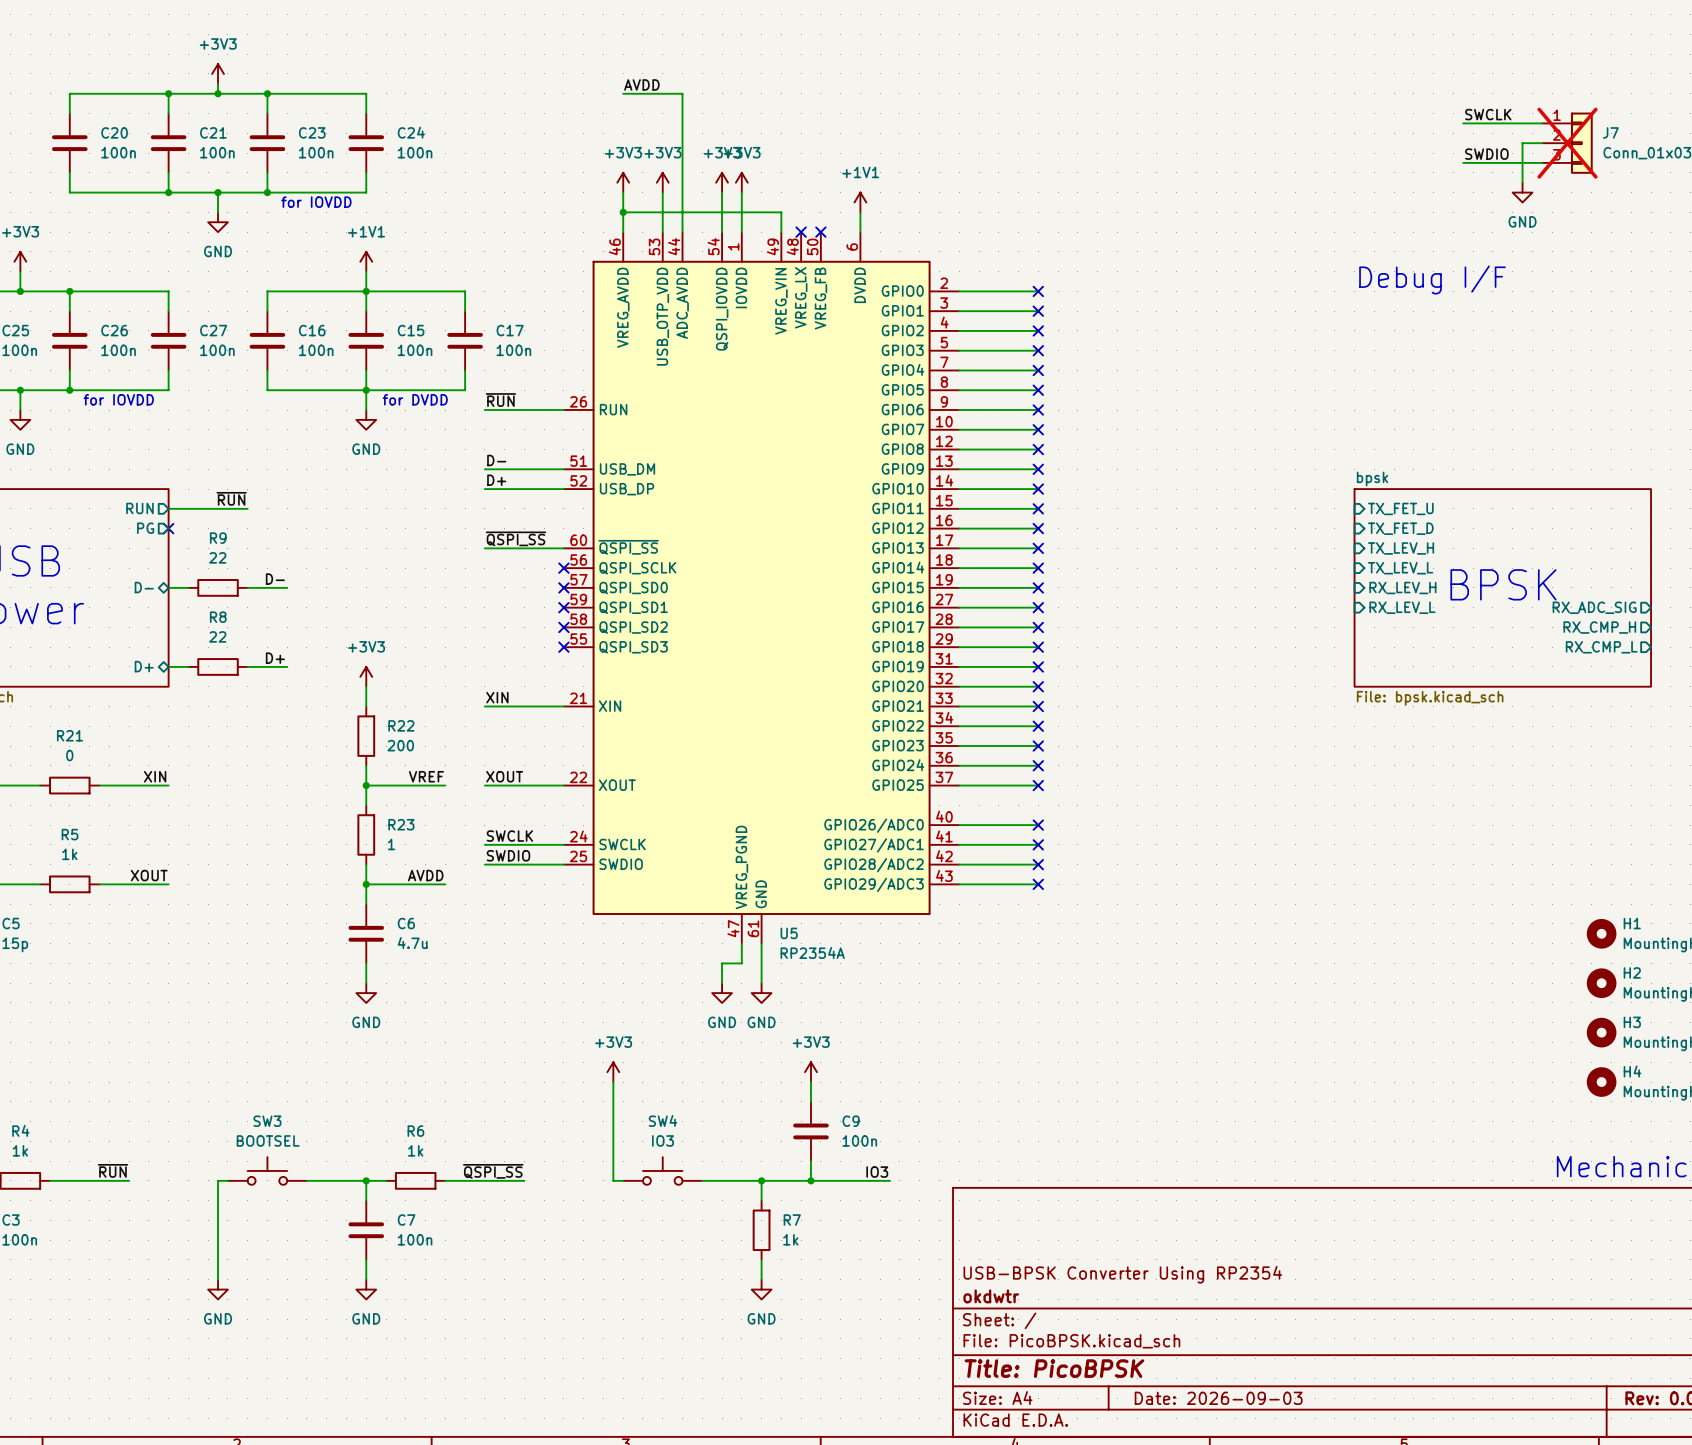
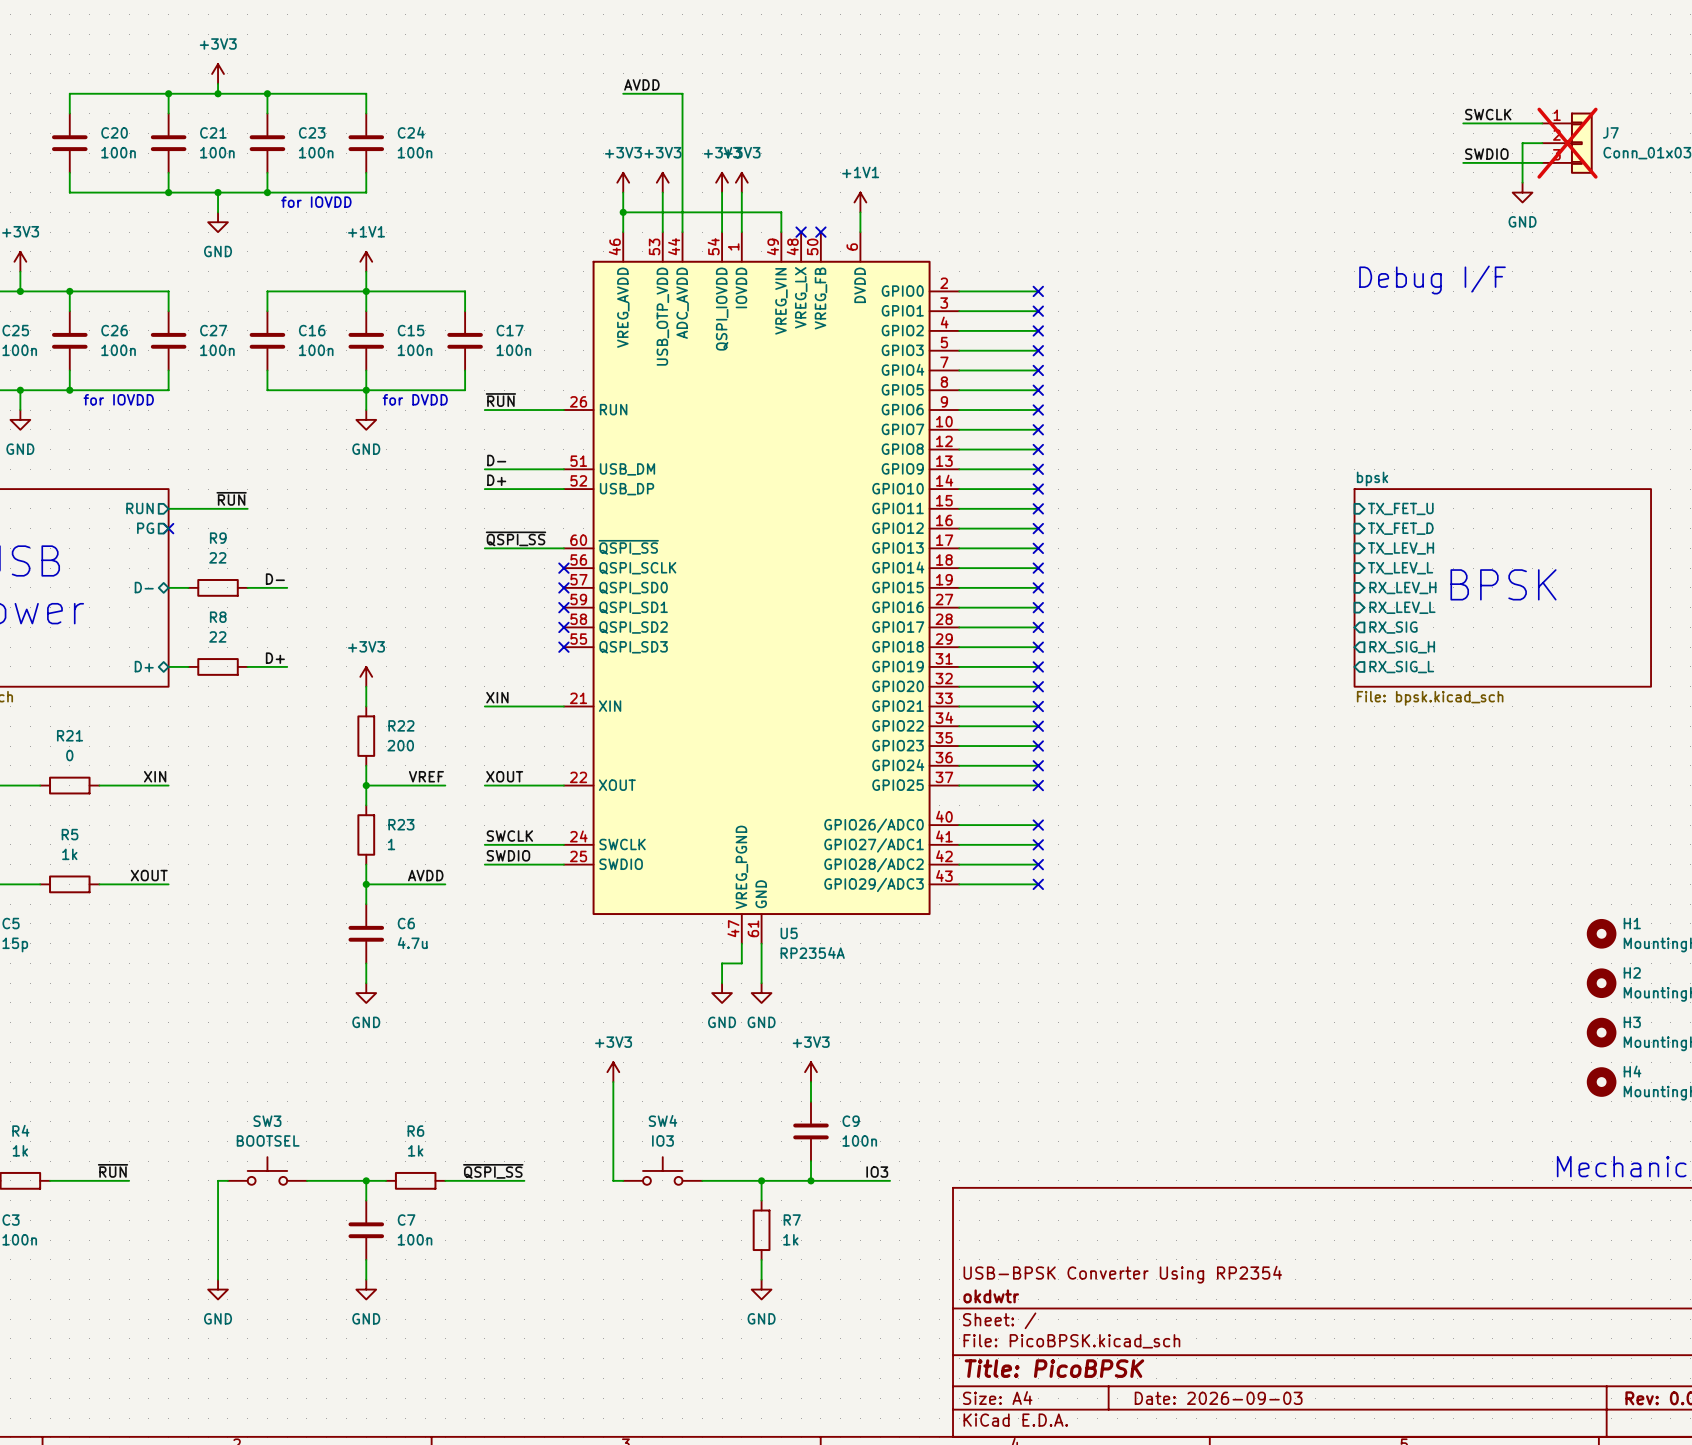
sheet pin: RX_ADC_SIG (1594, 607) -> none
sheet pin: none -> RX_SIG (1393, 627)
sheet pin: RX_CMP_H (1599, 627) -> none
sheet pin: none -> RX_SIG_H (1402, 647)
sheet pin: RX_CMP_L (1601, 647) -> none
sheet pin: none -> RX_SIG_L (1401, 667)

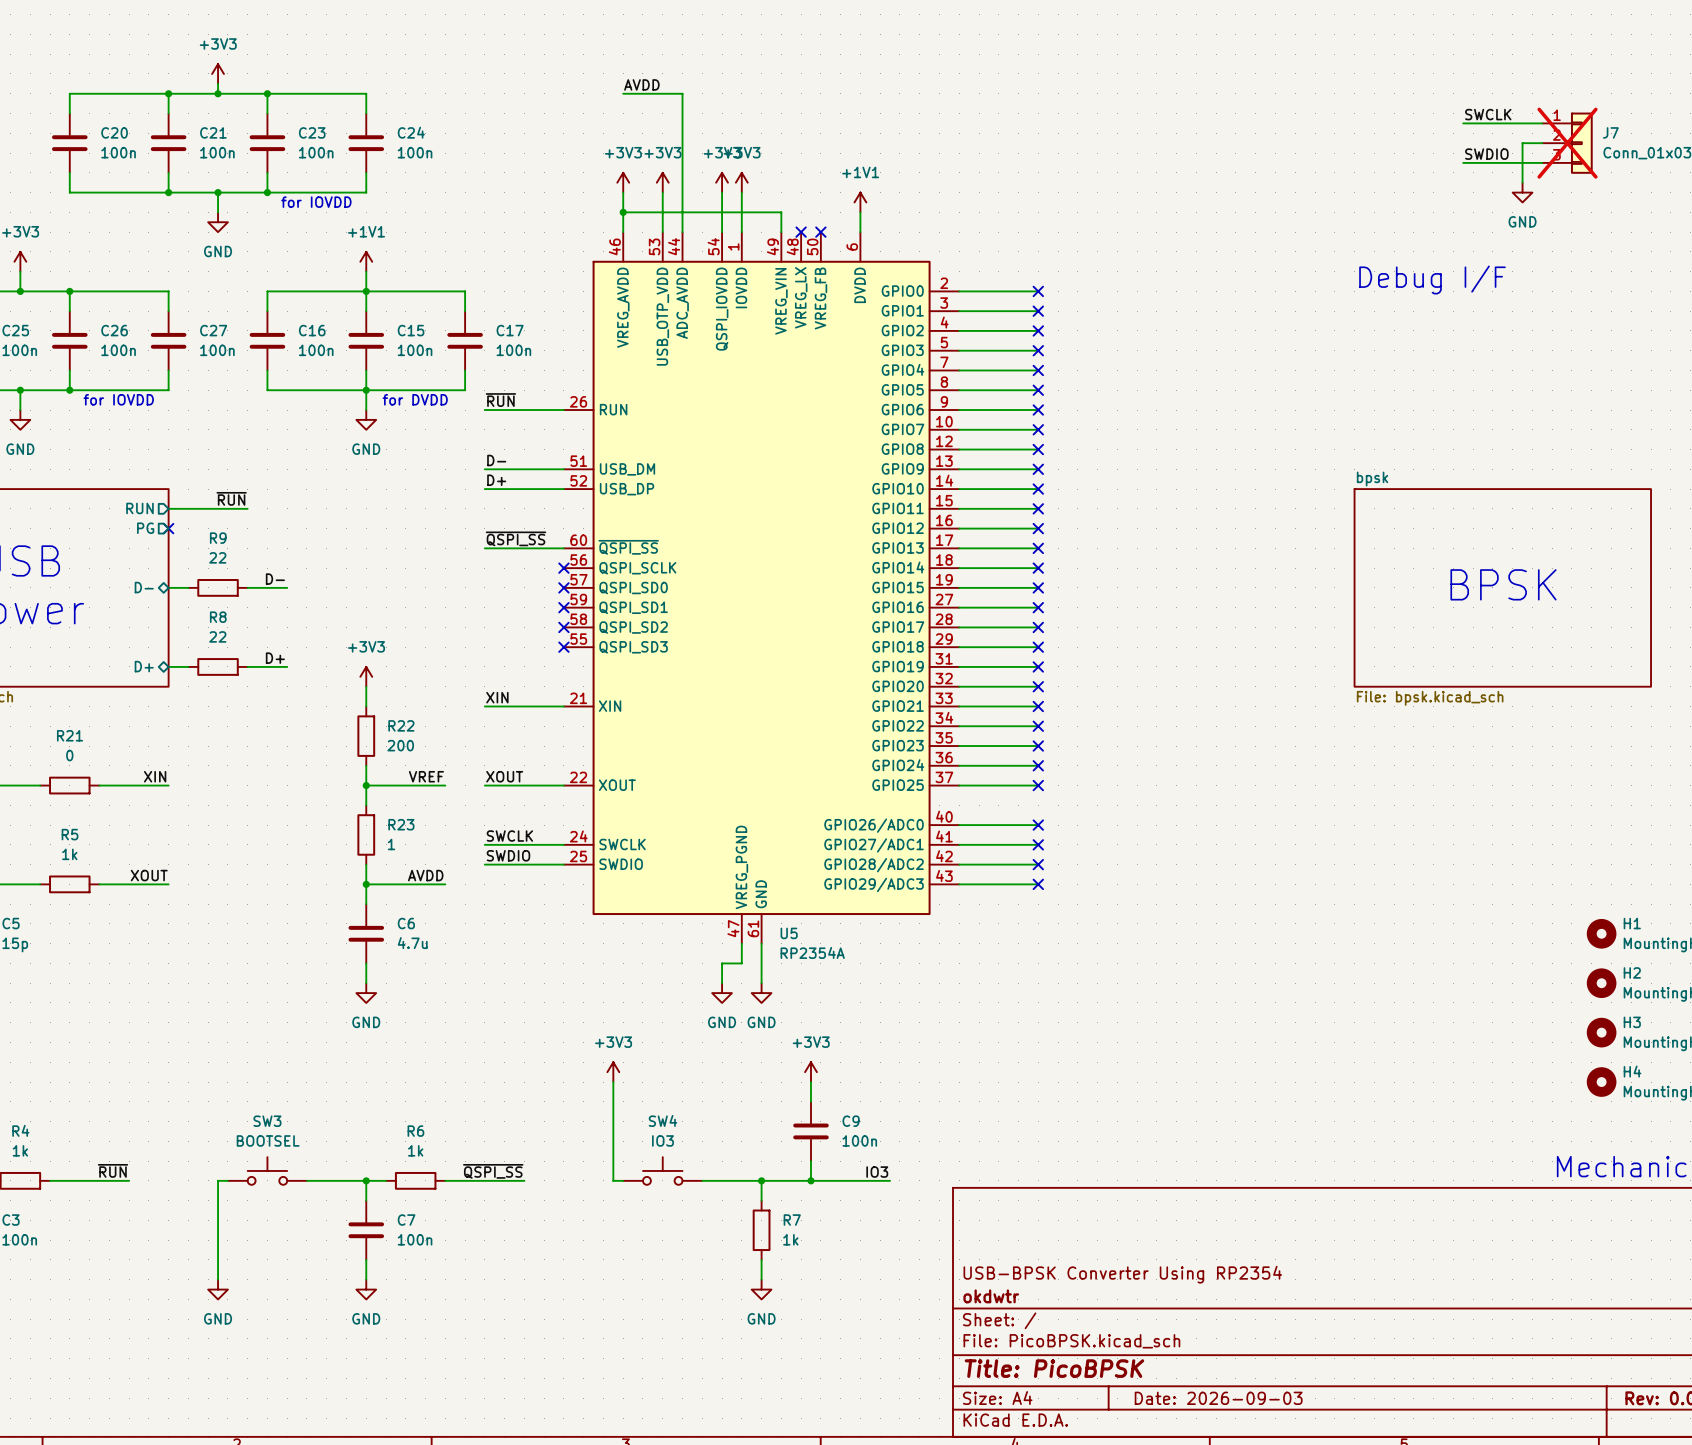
sheet pin: TX_FET_U (1400, 508) -> none
sheet pin: TX_FET_D (1400, 528) -> none
sheet pin: TX_LEV_H (1401, 548) -> none
sheet pin: TX_LEV_L (1400, 568) -> none
sheet pin: RX_LEV_H (1402, 588) -> none
sheet pin: RX_LEV_L (1402, 607) -> none
sheet pin: RX_SIG (1393, 627) -> none
sheet pin: RX_SIG_H (1402, 647) -> none
sheet pin: RX_SIG_L (1401, 667) -> none

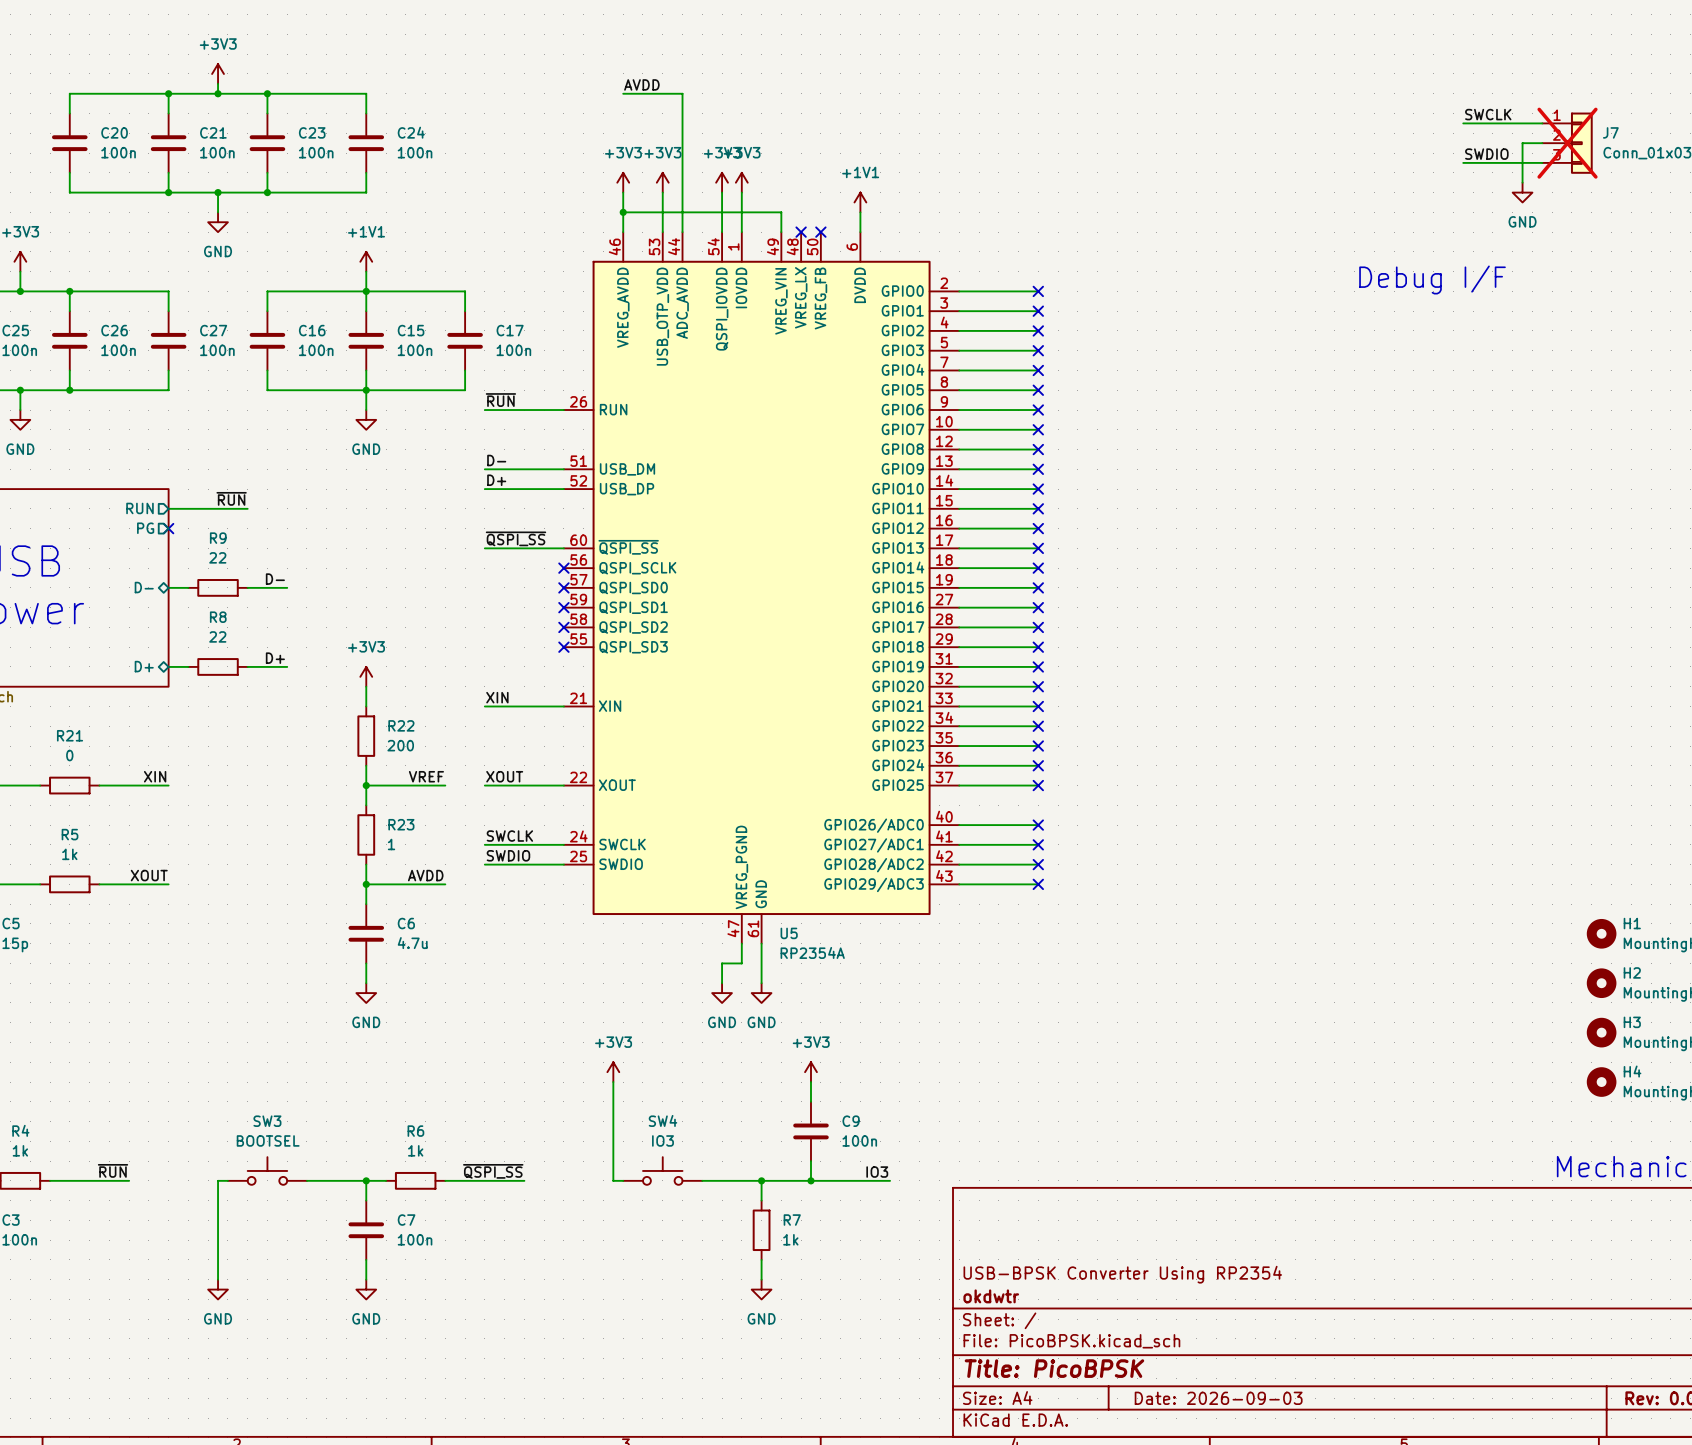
text: for IOVDD (316, 202) -> none
text: for IOVDD (118, 399) -> none
text: for DVDD (415, 399) -> none
text: BPSK (1503, 584) -> none
sheet bpsk: File: bpsk.kicad_sch (1502, 587) -> none

